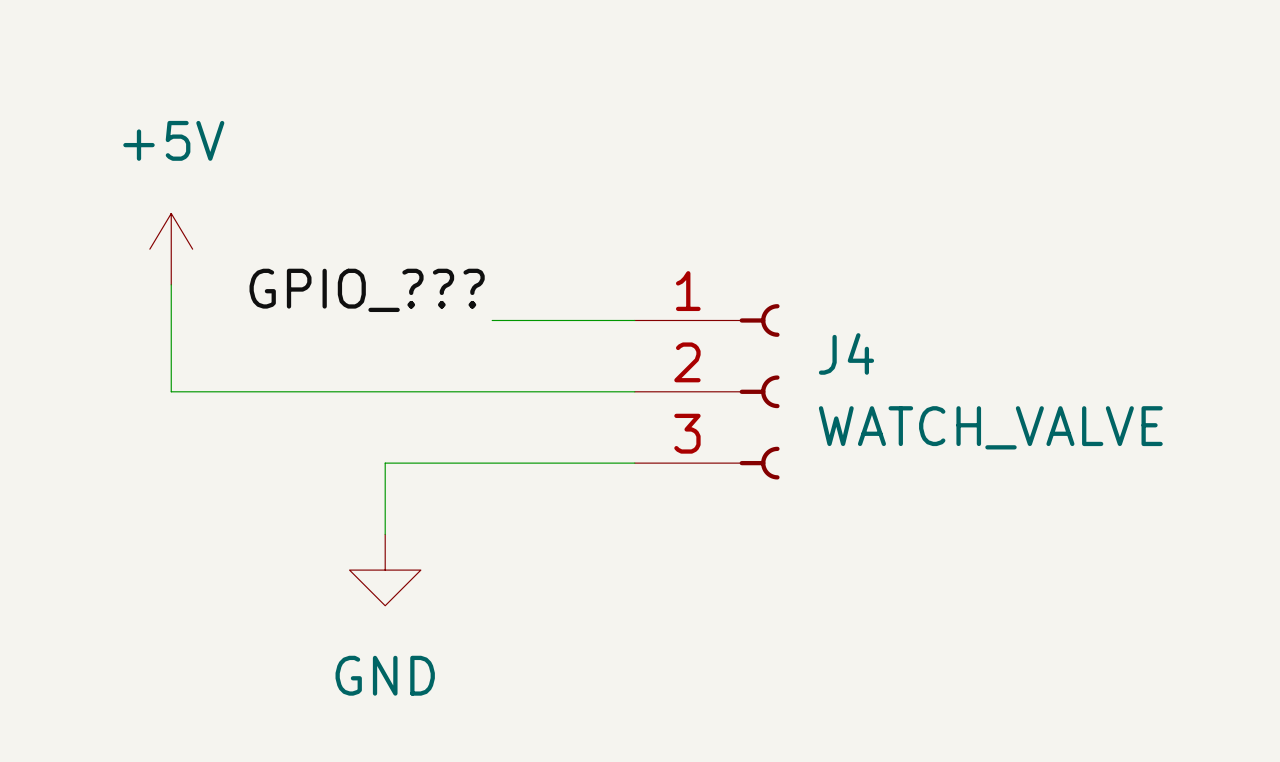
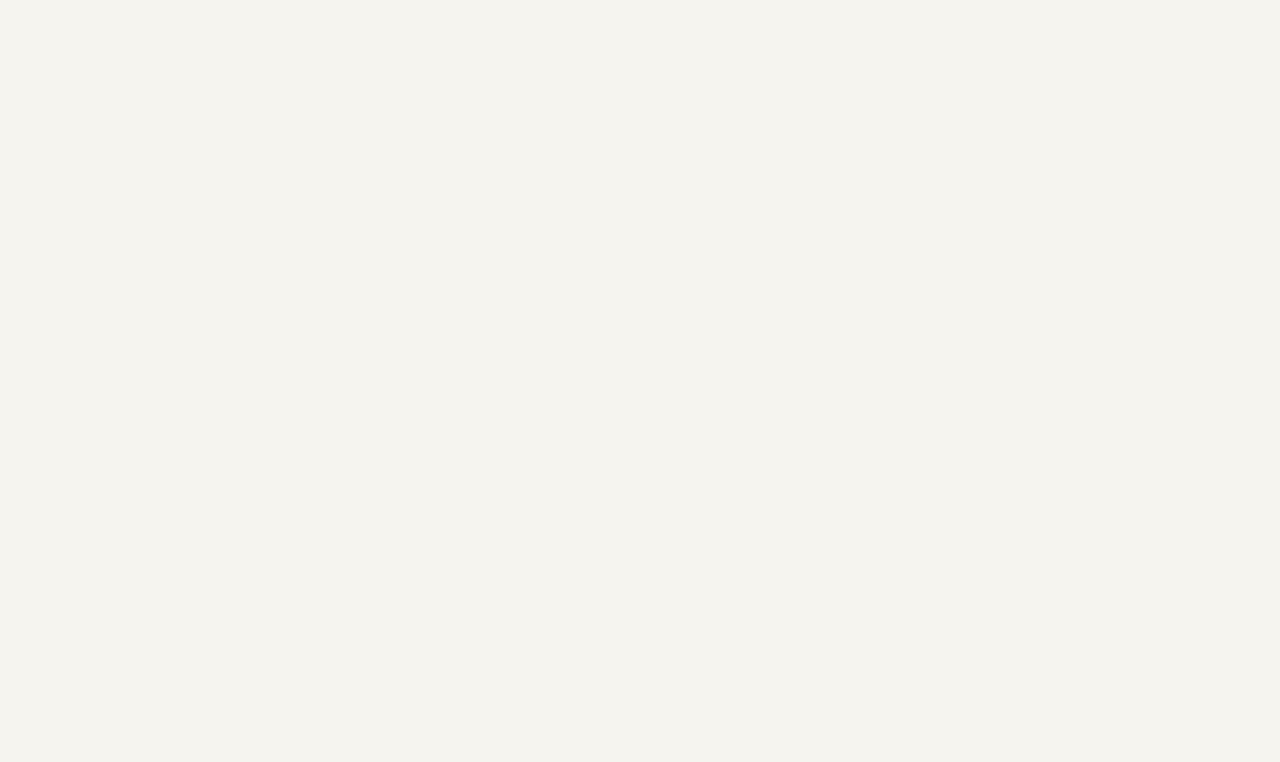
power symbol: +5V (171, 249) -> none
wire: (171, 284) (171, 391) (634, 391) -> none
label: GPIO_??? (367, 290) -> none
wire: (492, 320) (634, 320) -> none
J4: WATCH_VALVE (707, 391) -> none
wire: (634, 463) (385, 463) (385, 534) -> none
power symbol: GND (385, 570) -> none

